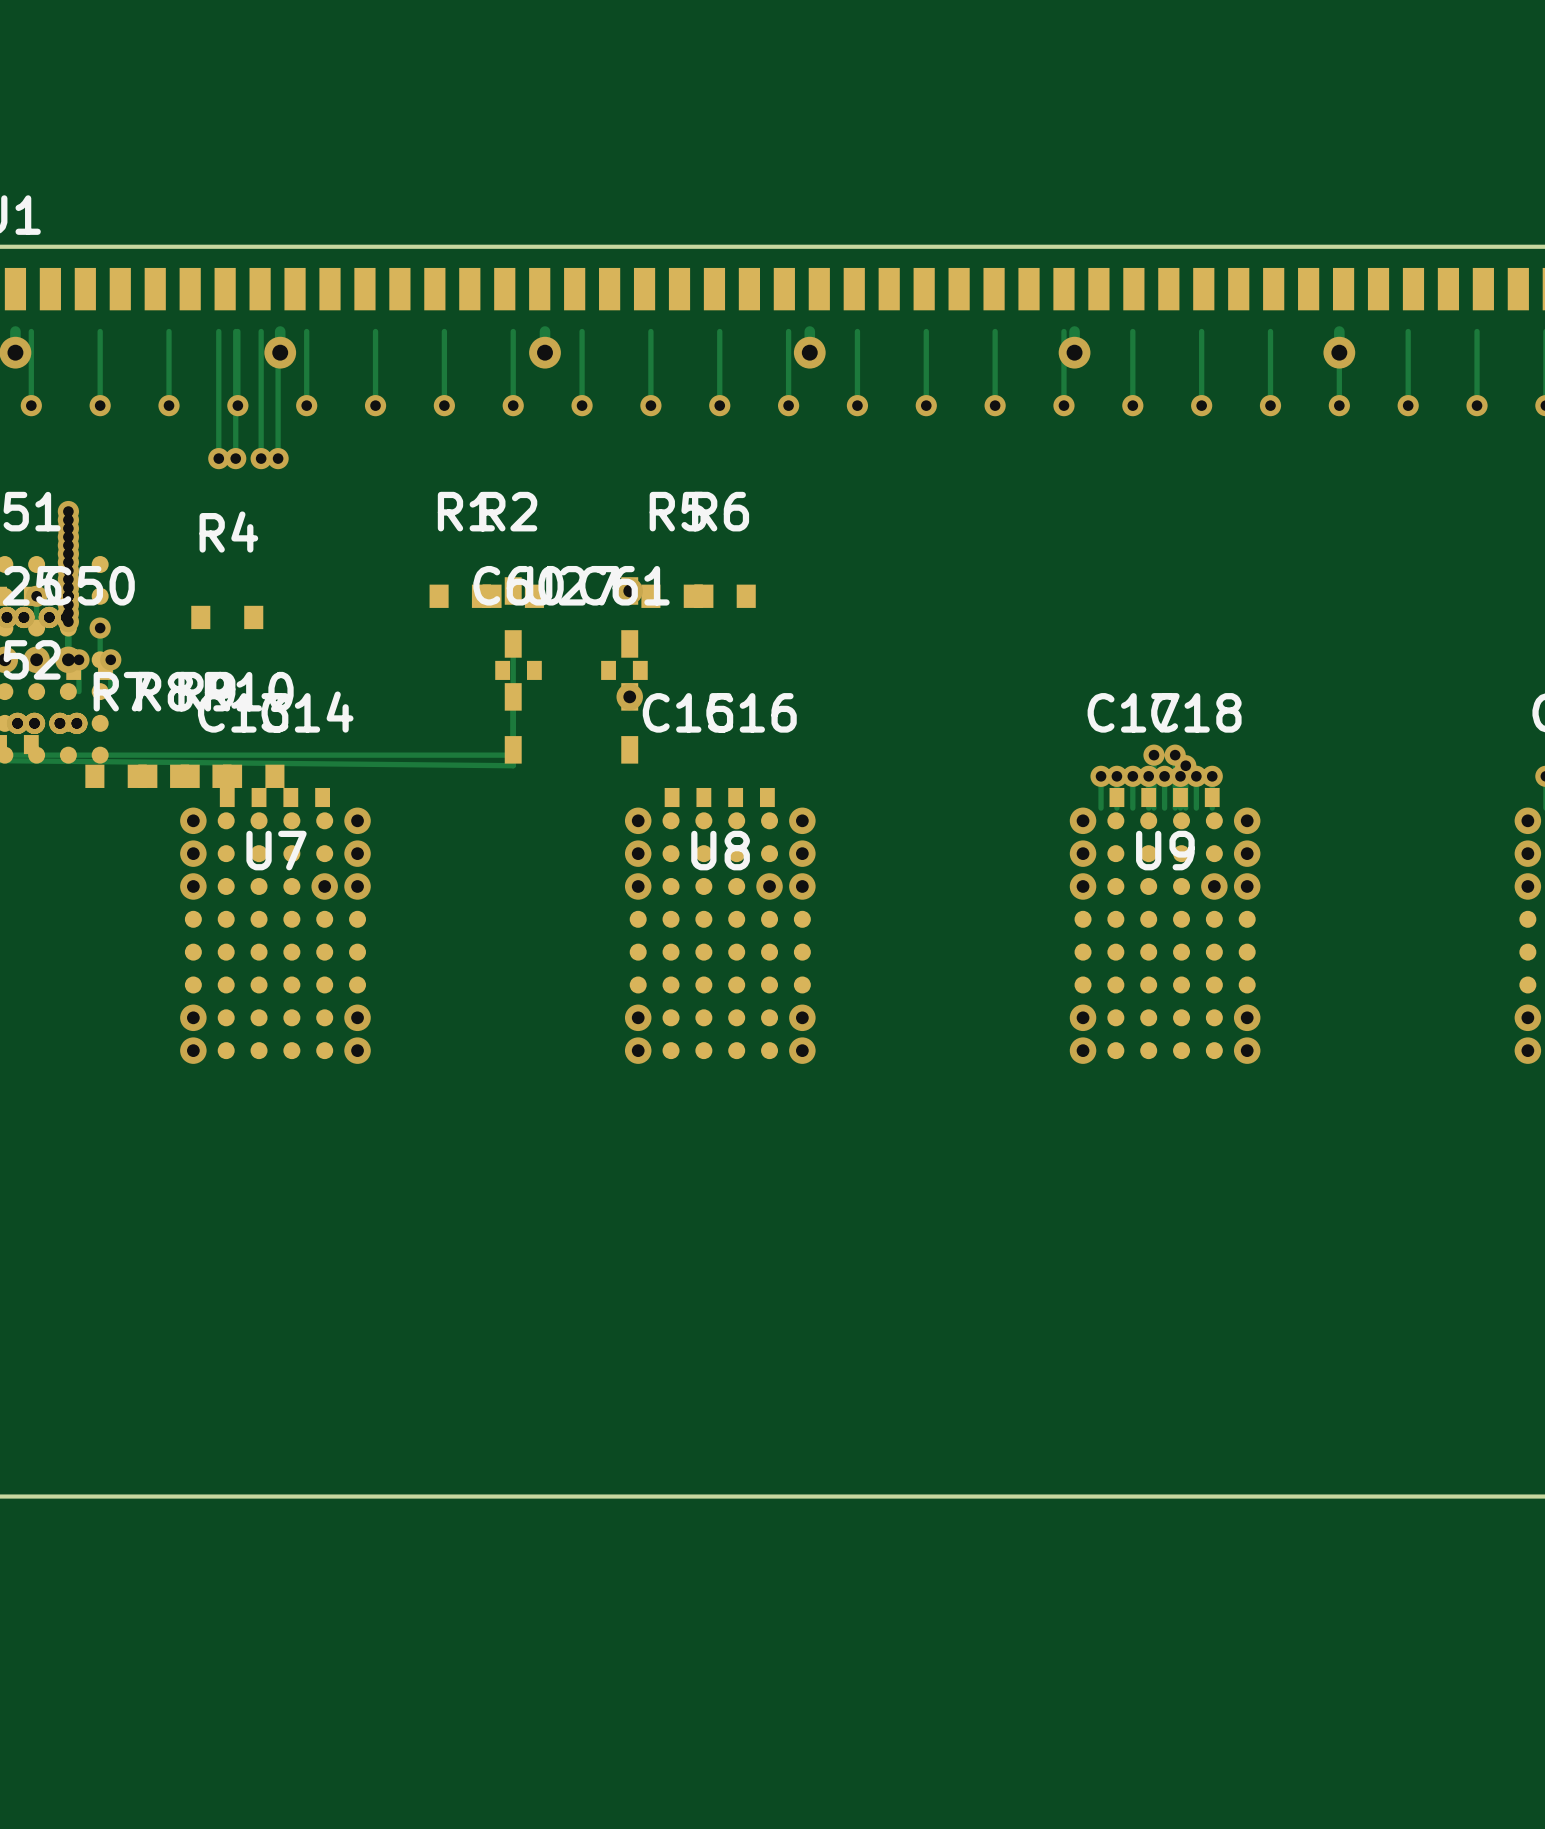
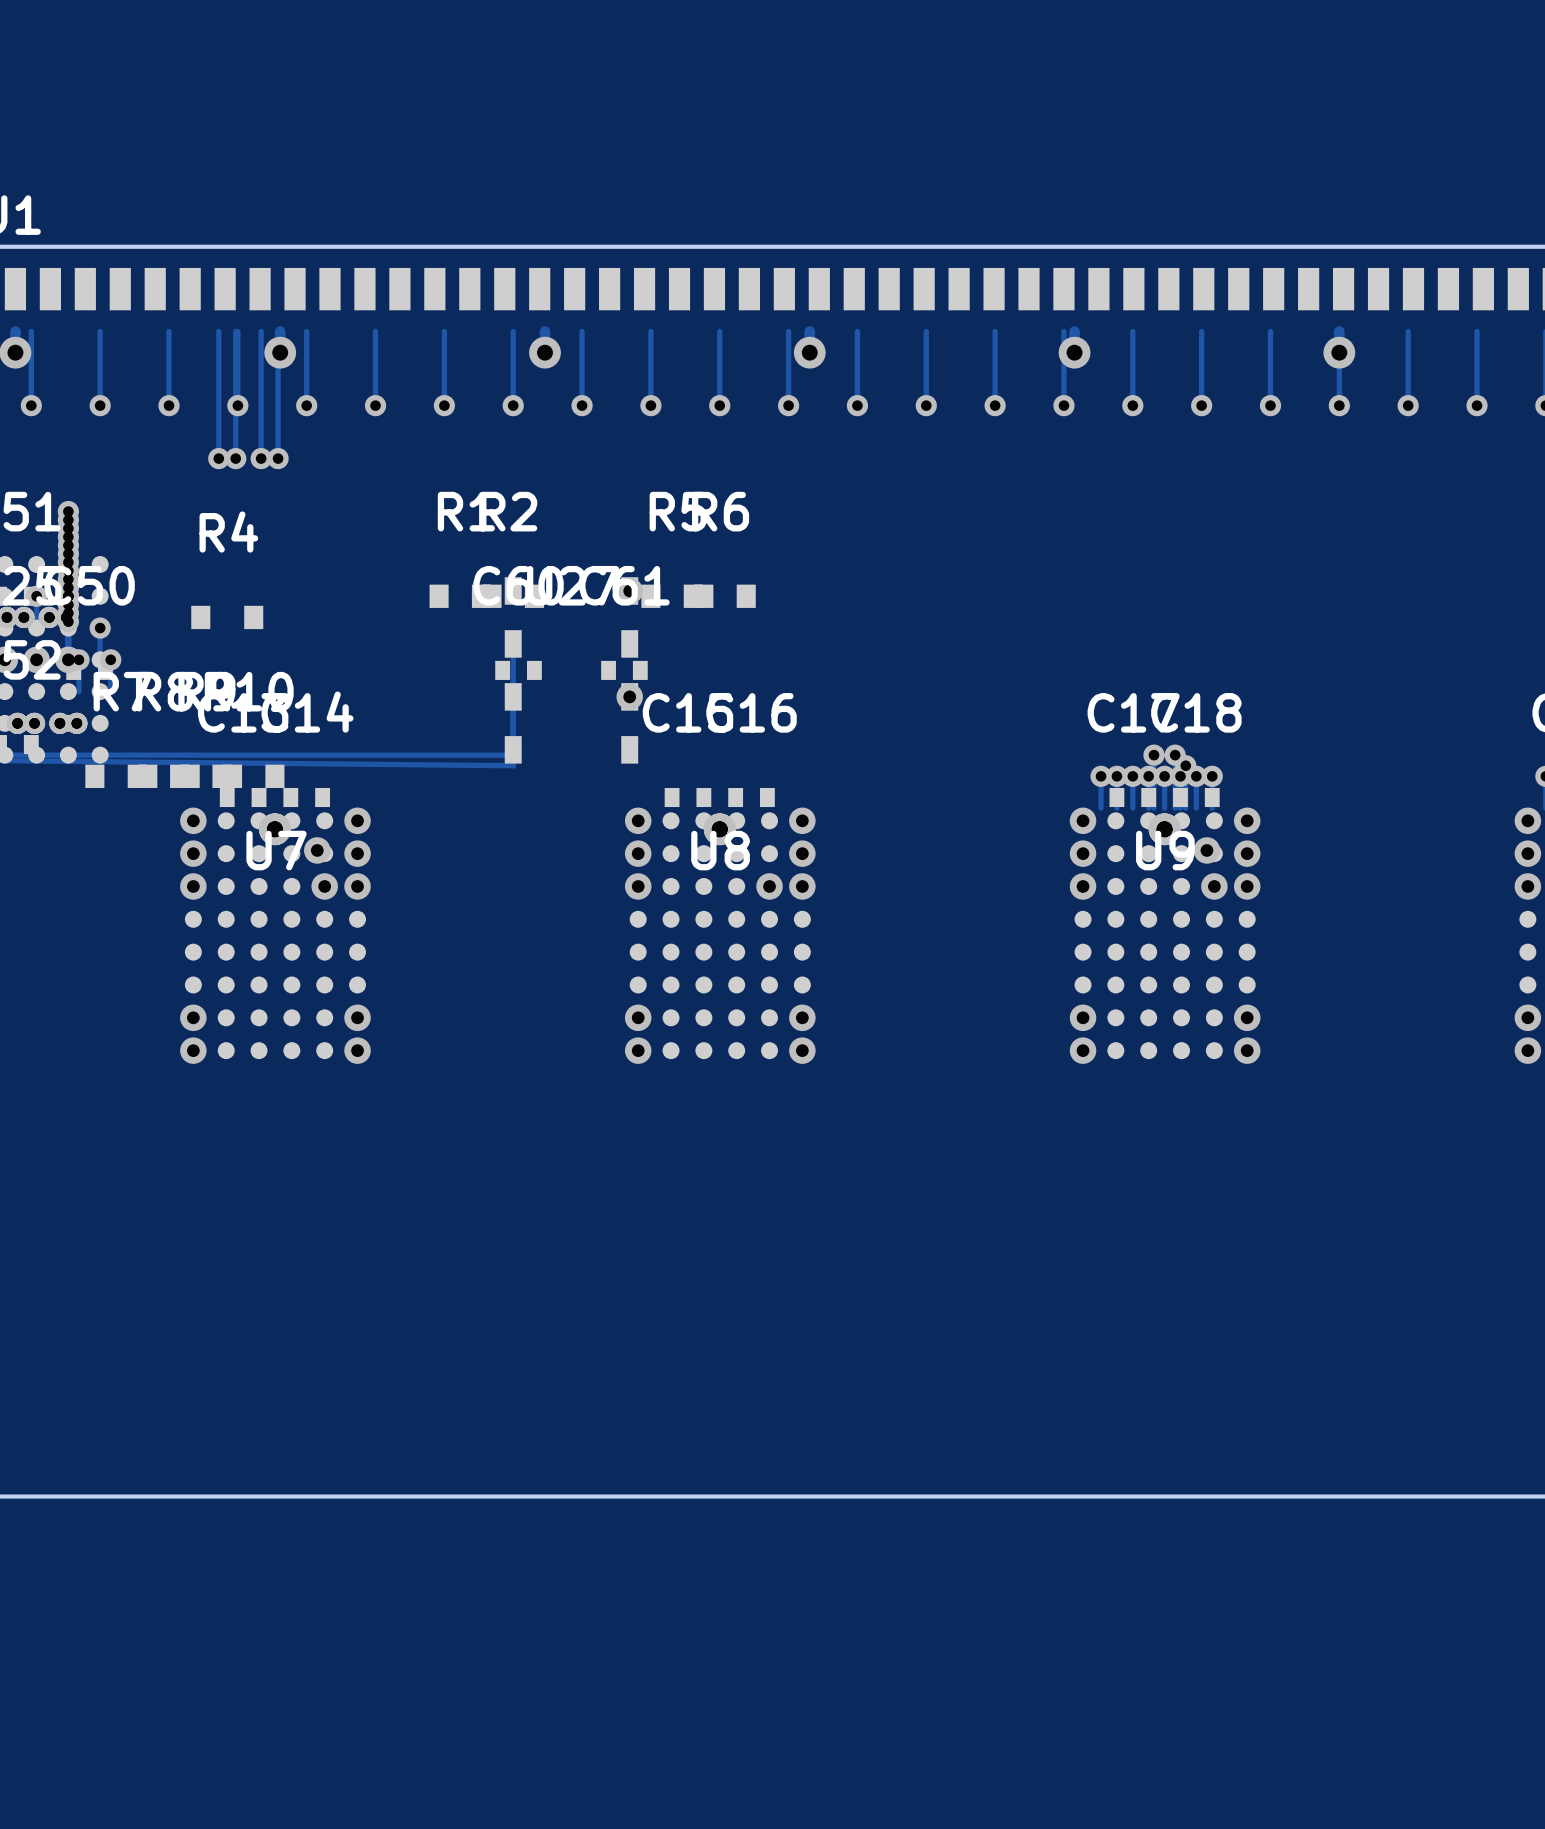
via: none -> (274, 829)
via: none -> (719, 829)
via: none -> (1164, 829)
via: none -> (317, 850)
via: none -> (1206, 850)

